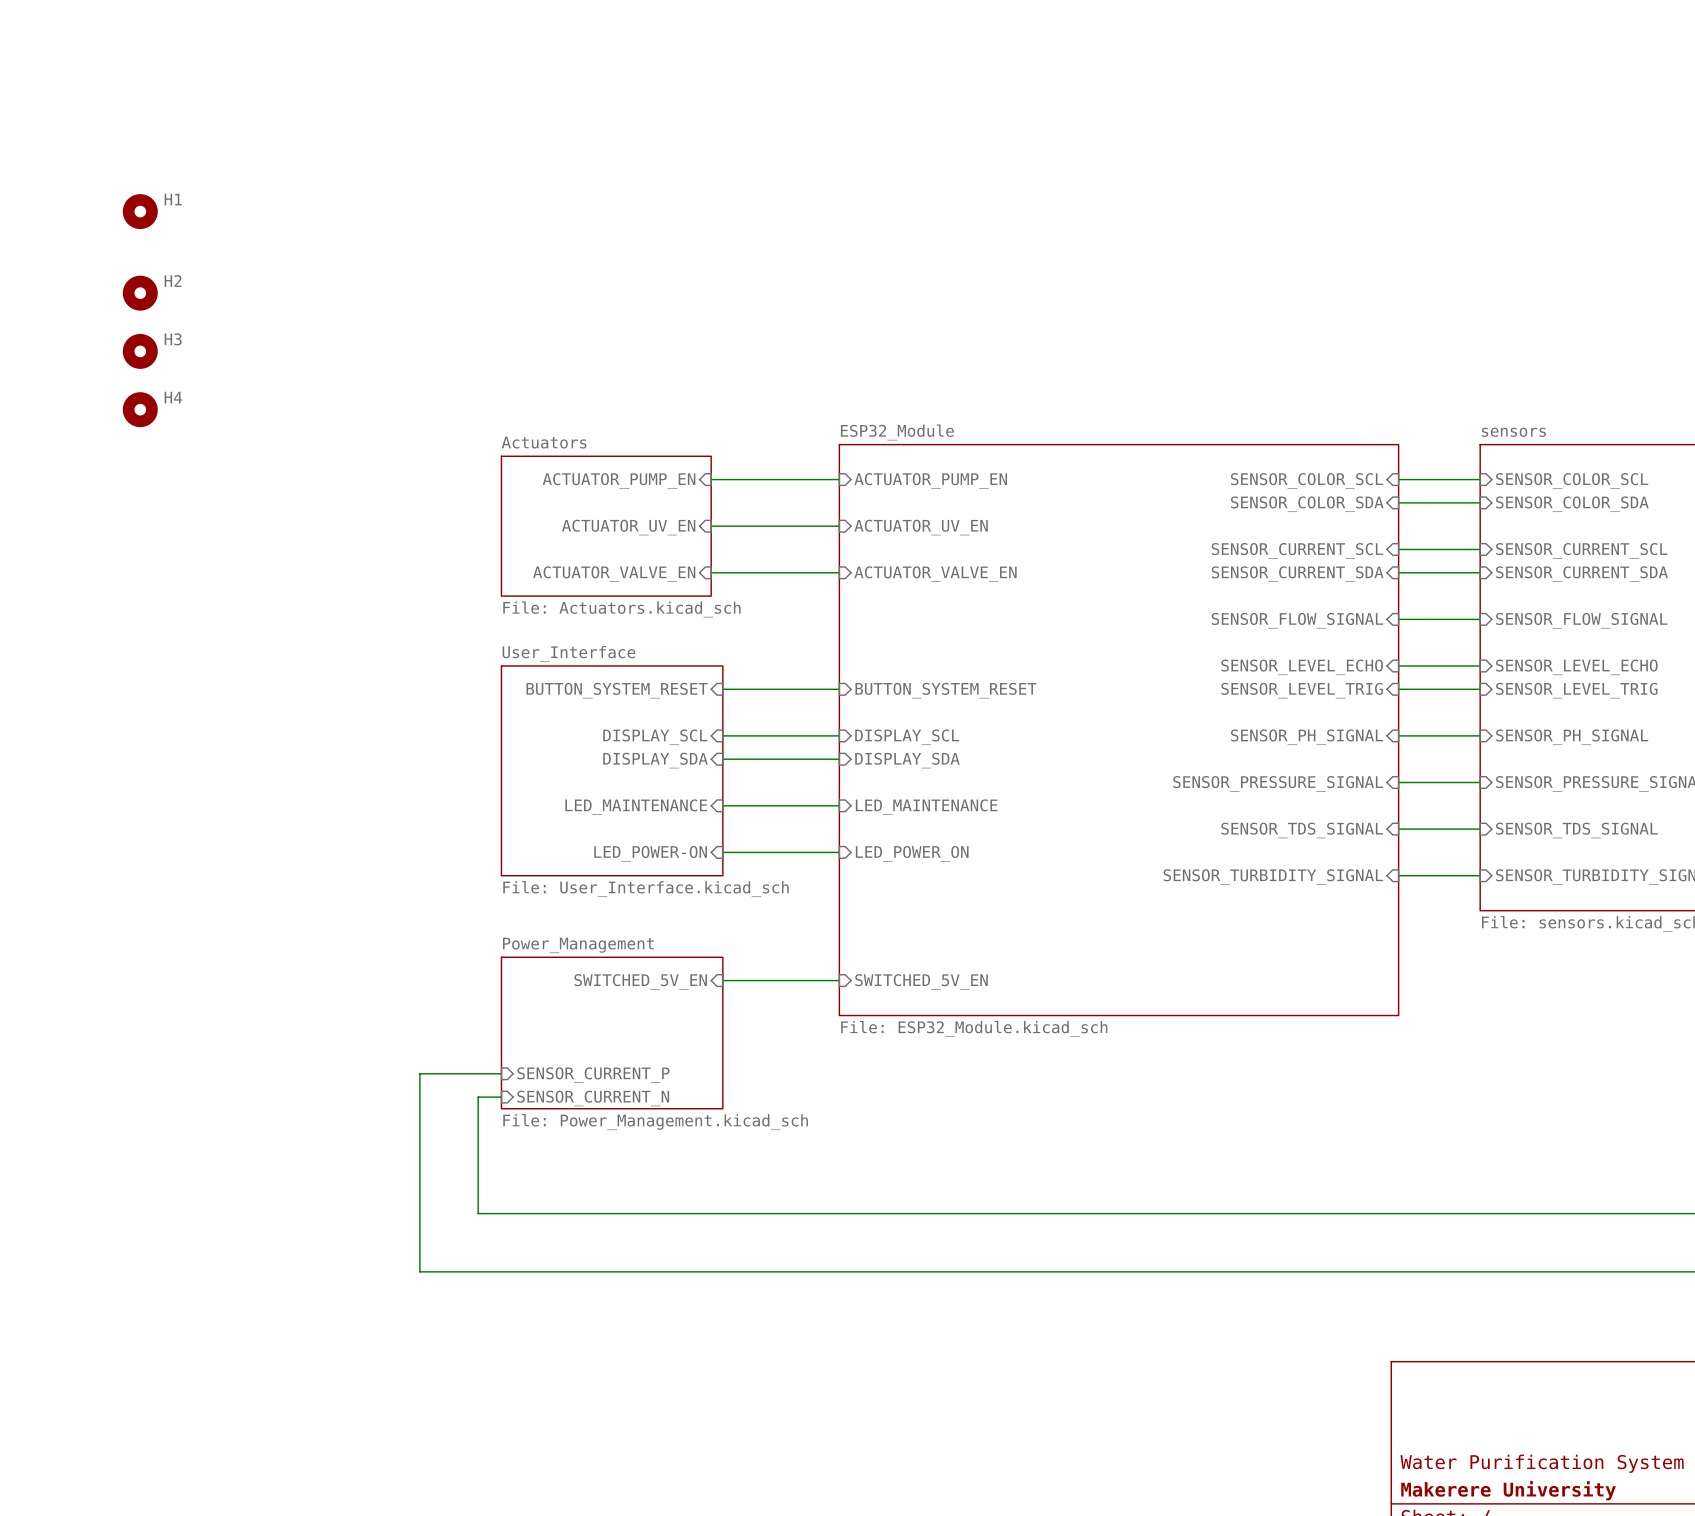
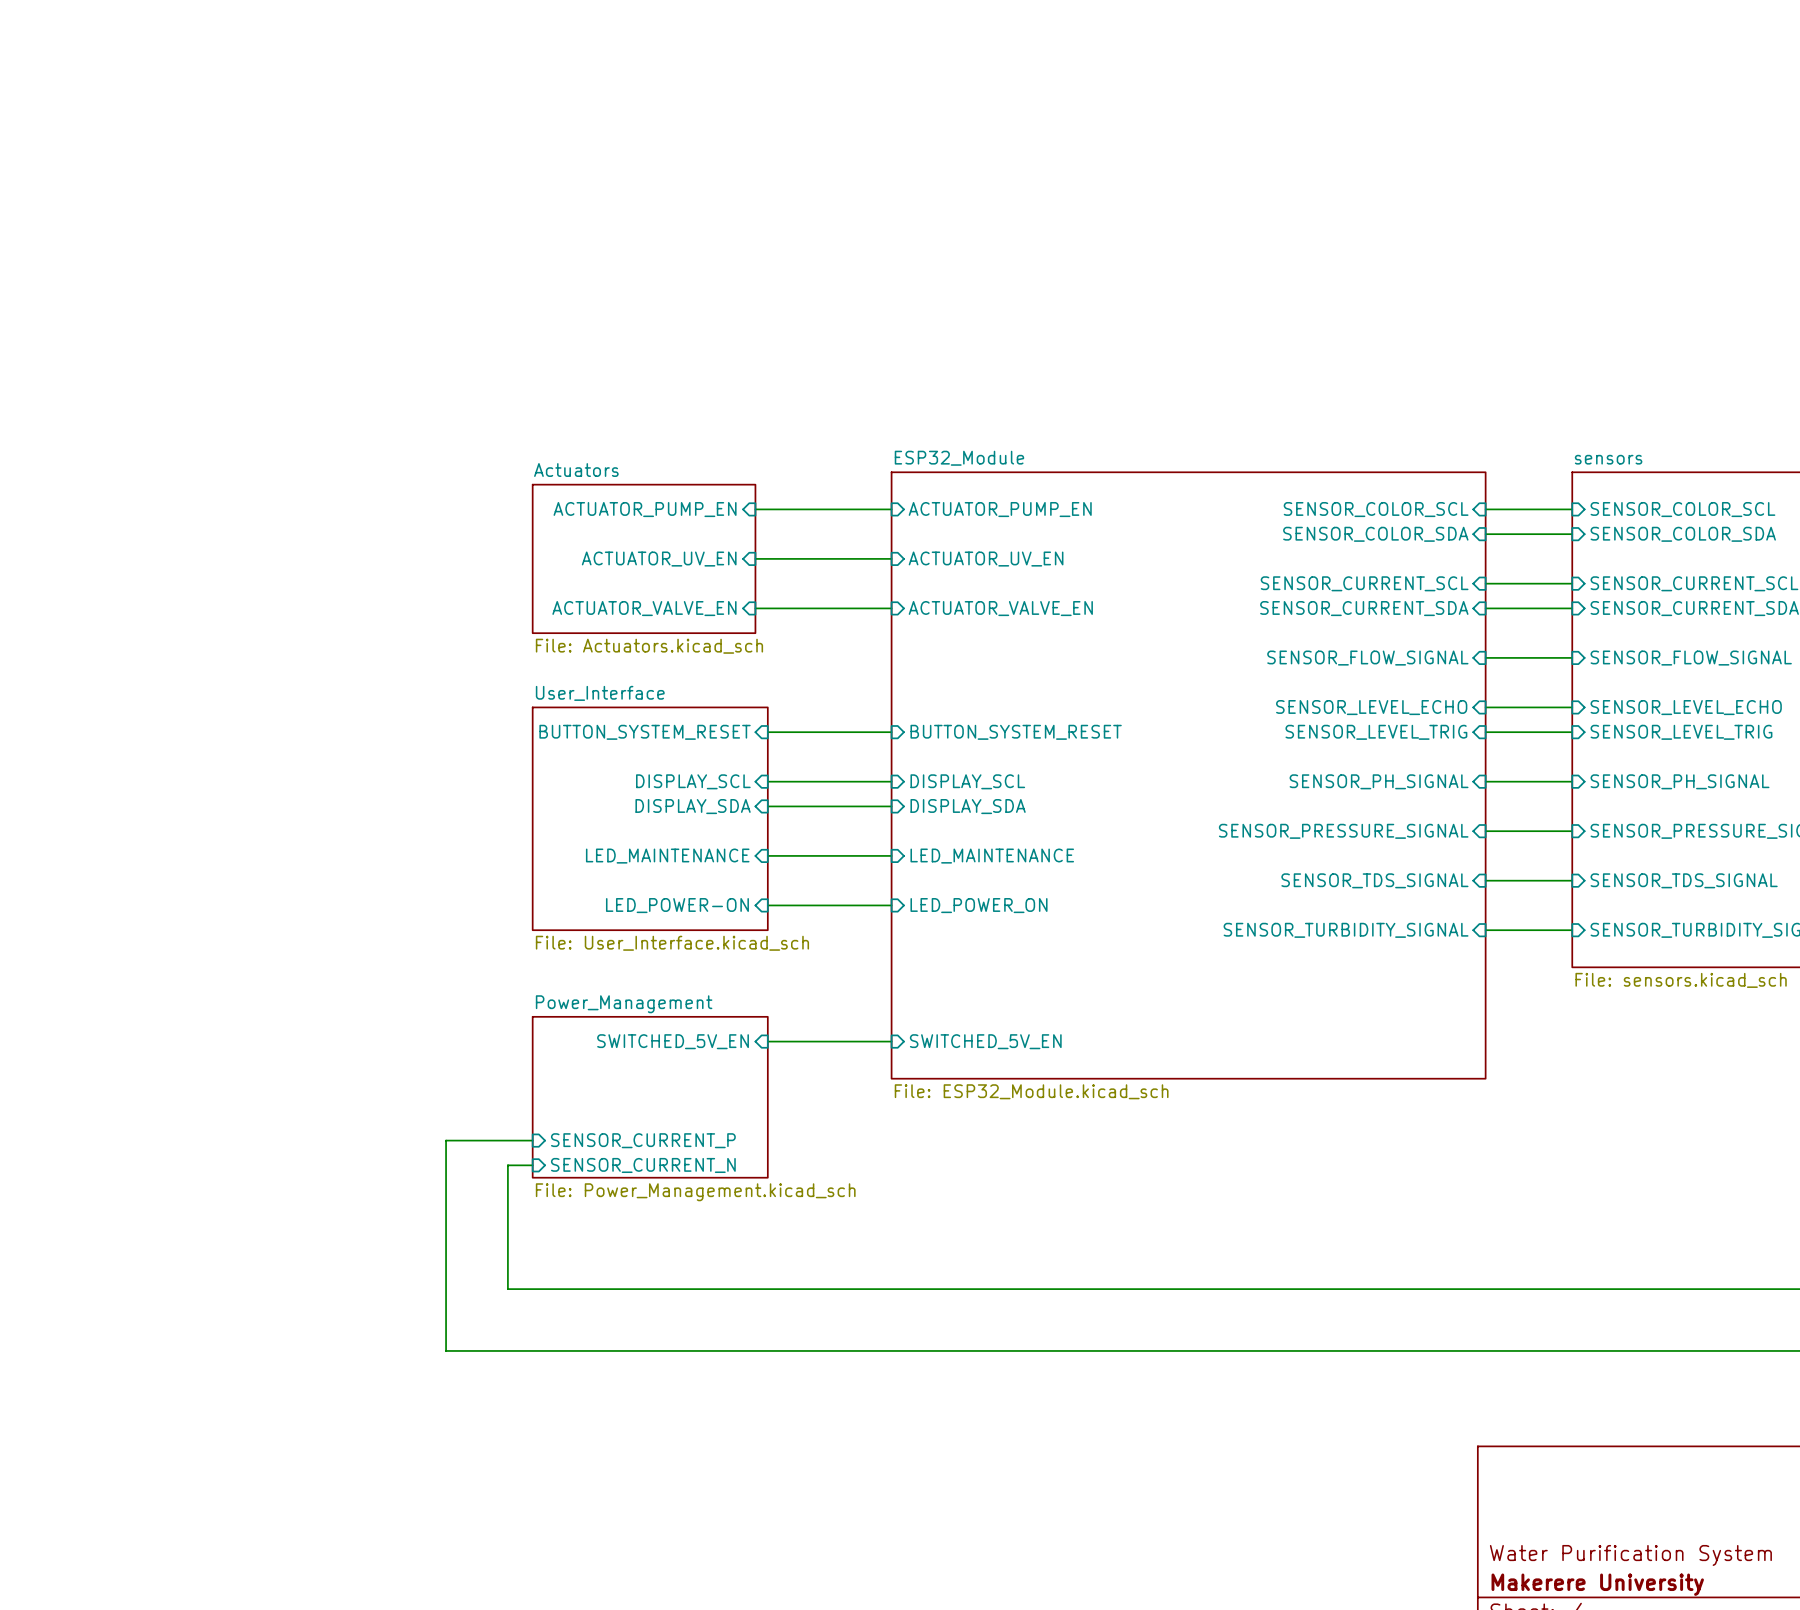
H1: (140, 211) -> none
H2: (140, 293) -> none
H3: (140, 351) -> none
H4: (140, 409) -> none

